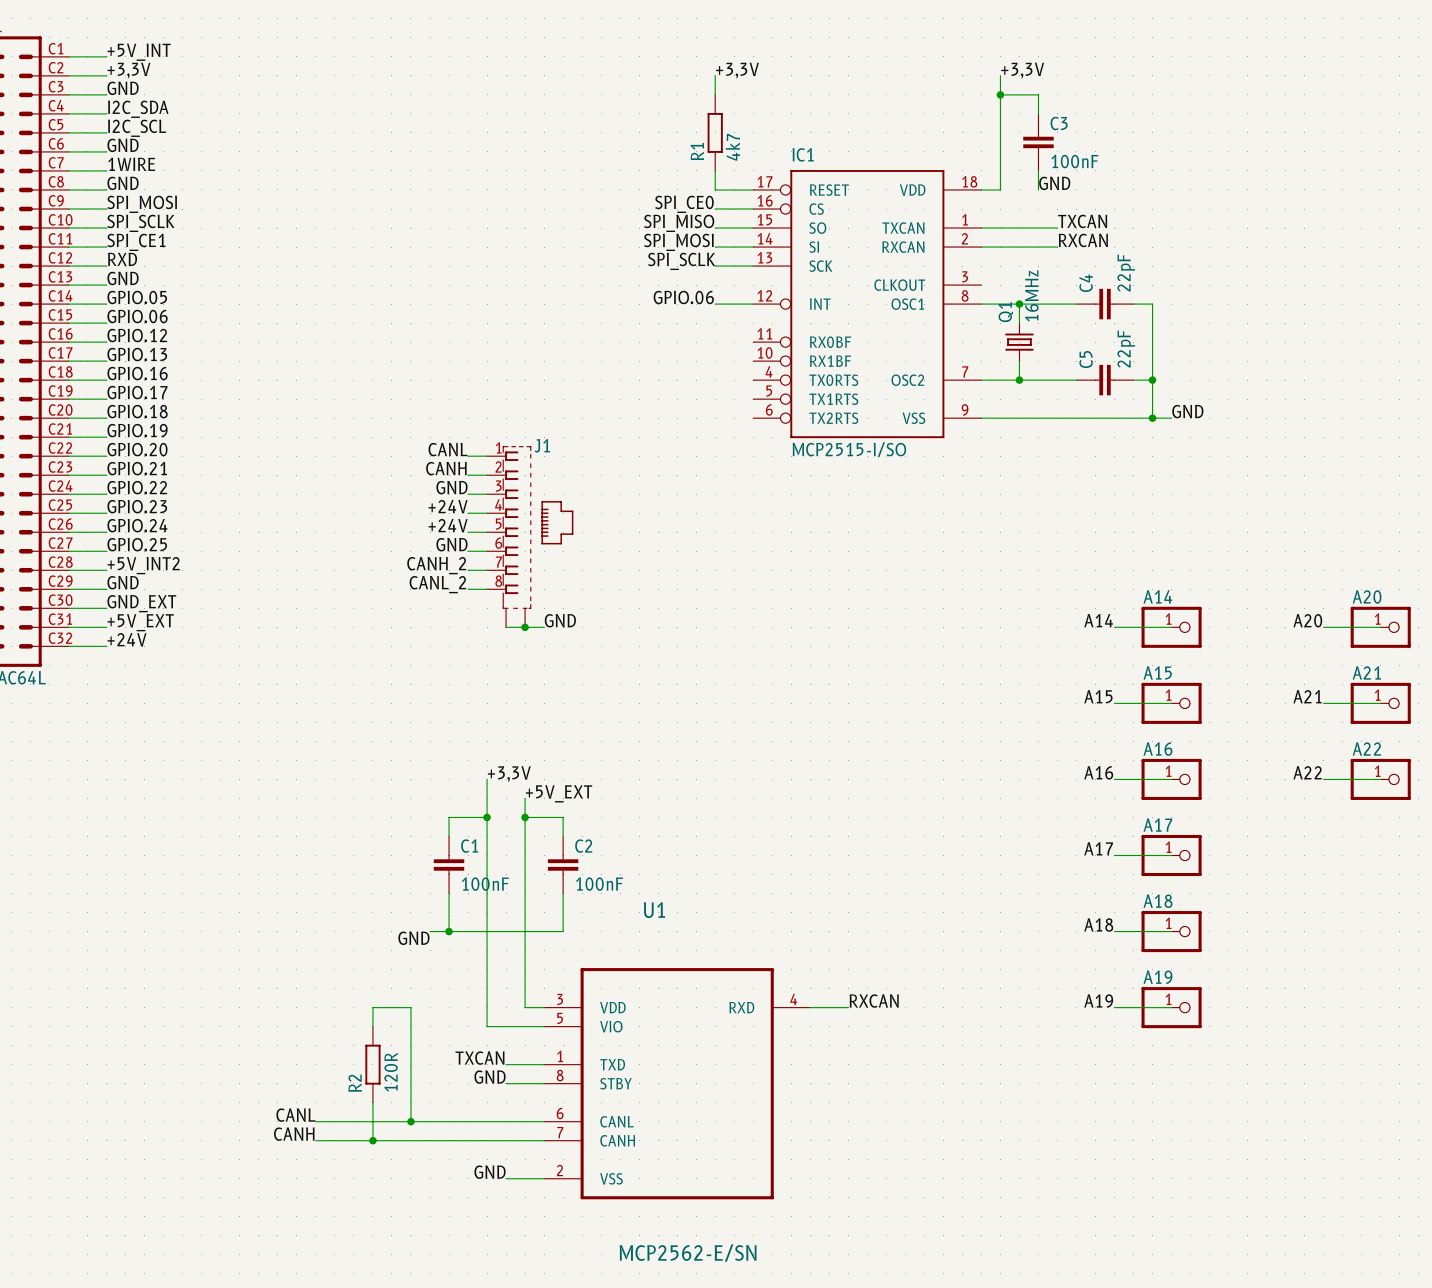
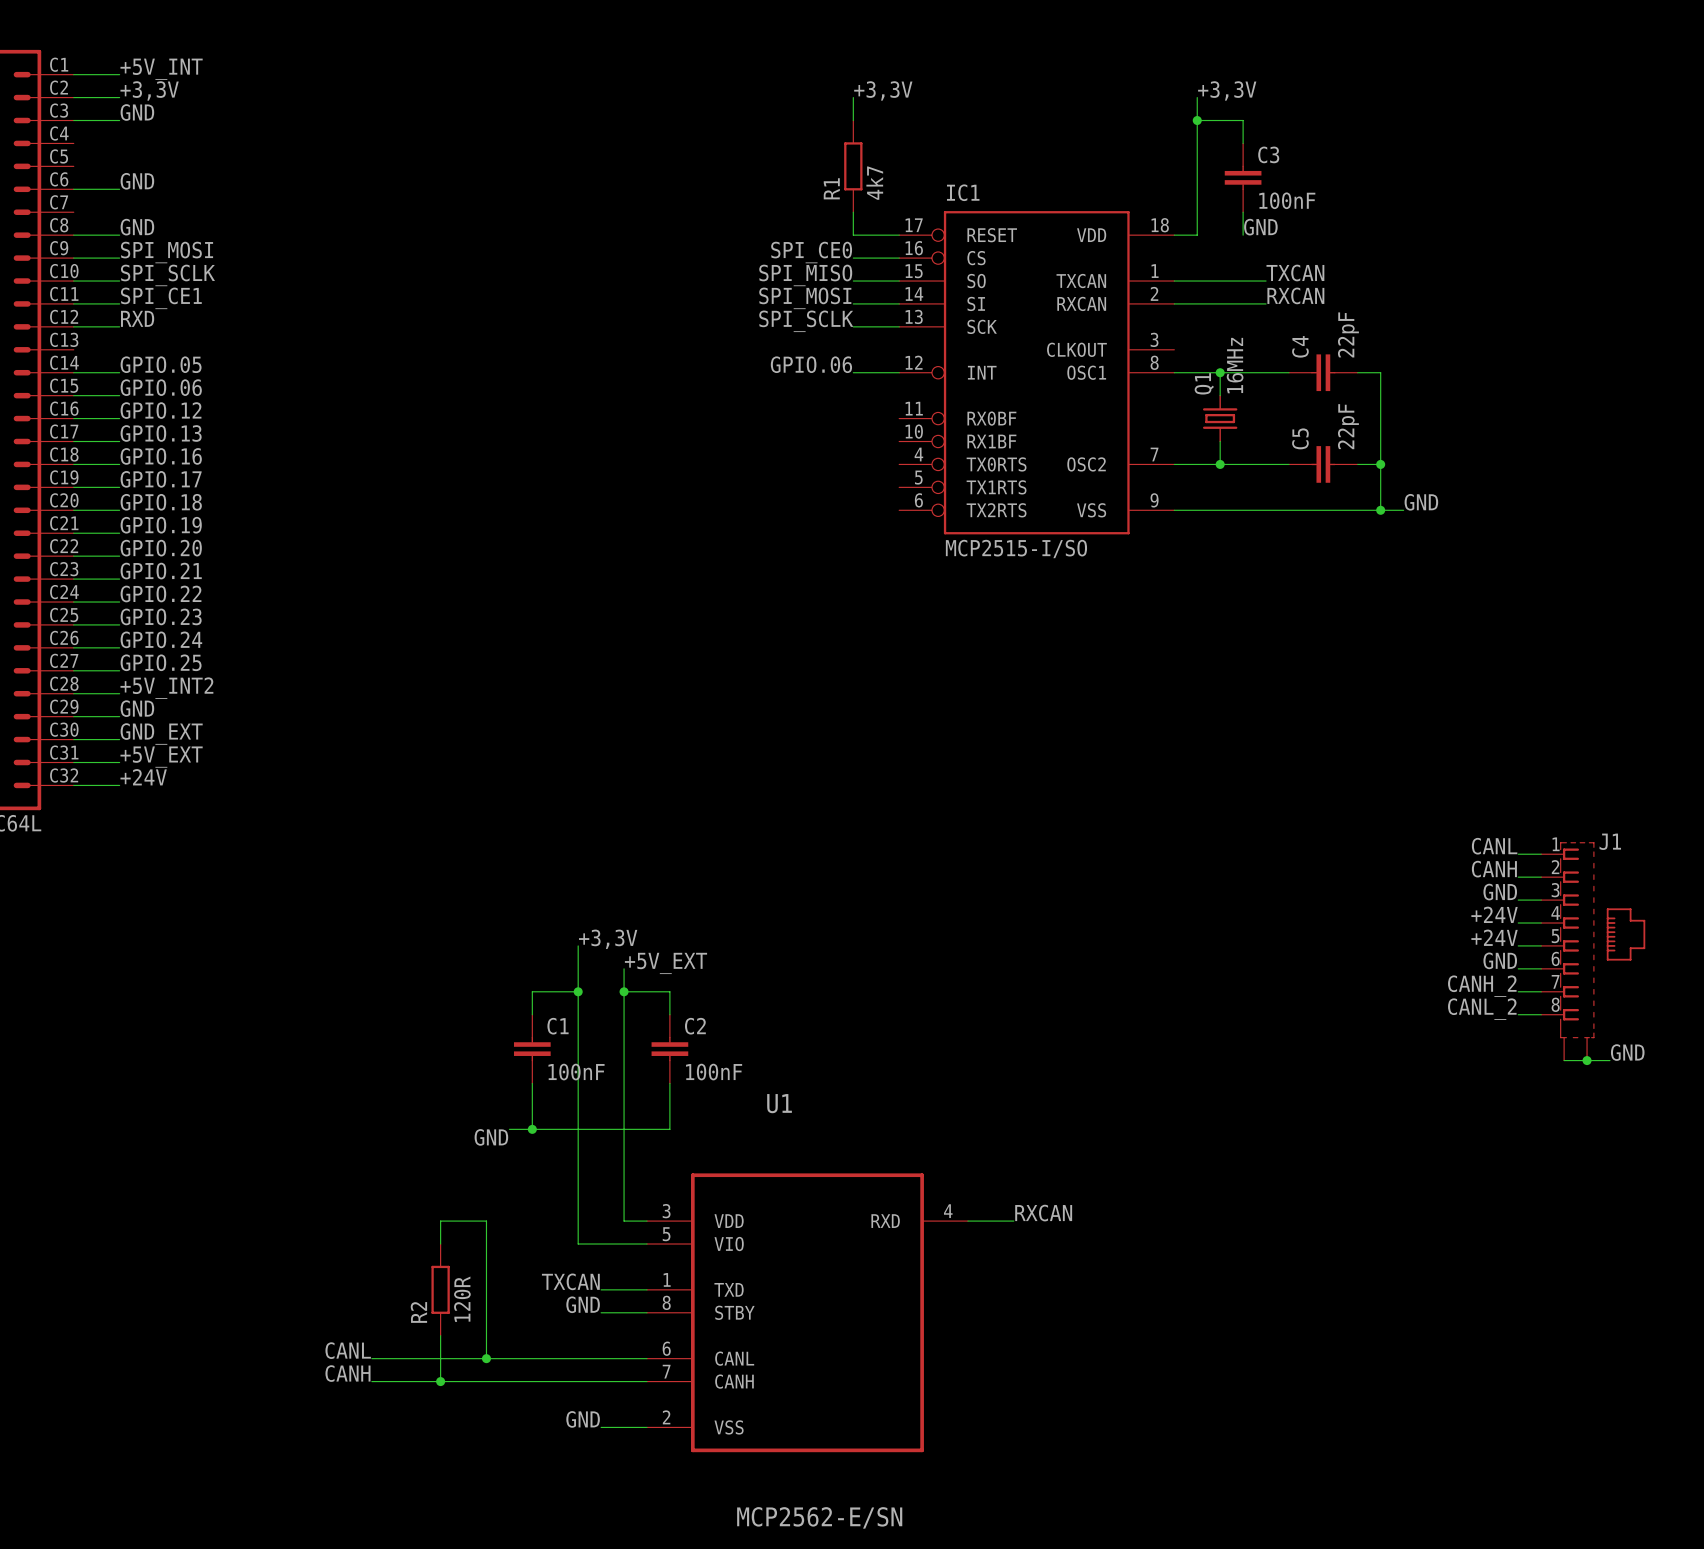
label: I2C_SDA (138, 109) -> none
wire: (68, 113) (106, 113) -> none
label: I2C_SCL (137, 128) -> none
wire: (68, 132) (106, 132) -> none
label: 1WIRE (131, 164) -> none
wire: (68, 170) (106, 170) -> none
label: GND (123, 278) -> none
wire: (68, 285) (106, 285) -> none
label: CANL (448, 449) -> none
wire: (468, 456) (487, 456) -> none
label: CANH (446, 468) -> none
wire: (468, 475) (487, 475) -> none
label: GND (451, 487) -> none
wire: (468, 494) (487, 494) -> none
label: +24V (448, 506) -> none
wire: (468, 513) (487, 513) -> none
label: +24V (448, 525) -> none
wire: (468, 532) (487, 532) -> none
J1 position: (530, 536) -> (1593, 951)
label: GND (451, 544) -> none
wire: (468, 551) (487, 551) -> none
label: CANH_2 (436, 565) -> none
wire: (468, 570) (487, 570) -> none
label: CANL_2 (437, 584) -> none
wire: (468, 589) (487, 589) -> none
label: GND (560, 620) -> none
label: A14 (1098, 620) -> none
label: A20 (1307, 620) -> none
wire: (506, 627) (544, 627) -> none
junction: (525, 627) -> none
wire: (1114, 627) (1171, 627) -> none
A14: (1171, 627) -> none
wire: (1323, 627) (1380, 627) -> none
A20: (1380, 627) -> none
label: A15 (1098, 696) -> none
label: none -> CANL (1494, 846)
label: A21 (1307, 696) -> none
wire: (1114, 703) (1171, 703) -> none
A15: (1171, 703) -> none
wire: none -> (1518, 854) (1541, 854)
wire: (1323, 703) (1380, 703) -> none
A21: (1380, 703) -> none
label: none -> CANH (1494, 869)
wire: none -> (1518, 877) (1541, 877)
label: none -> GND (1500, 892)
wire: none -> (1518, 900) (1541, 900)
label: none -> +24V (1494, 914)
wire: none -> (1518, 923) (1541, 923)
label: A16 (1098, 772) -> none
label: none -> +24V (1494, 937)
label: A22 (1307, 772) -> none
wire: (1114, 779) (1171, 779) -> none
A16: (1171, 779) -> none
wire: none -> (1518, 945) (1541, 945)
wire: (1323, 779) (1380, 779) -> none
A22: (1380, 779) -> none
label: none -> GND (1500, 960)
wire: none -> (1518, 968) (1541, 968)
label: none -> CANH_2 (1482, 986)
wire: none -> (1518, 991) (1541, 991)
label: none -> CANL_2 (1482, 1009)
wire: none -> (1518, 1014) (1541, 1014)
label: A17 (1098, 848) -> none
wire: (1114, 855) (1171, 855) -> none
A17: (1171, 855) -> none
label: none -> GND (1627, 1052)
wire: none -> (1564, 1060) (1609, 1060)
junction: none -> (1587, 1060)
label: A18 (1098, 924) -> none
wire: (1114, 931) (1171, 931) -> none
A18: (1171, 931) -> none
label: A19 (1098, 1001) -> none
wire: (1114, 1007) (1171, 1007) -> none
A19: (1171, 1007) -> none

